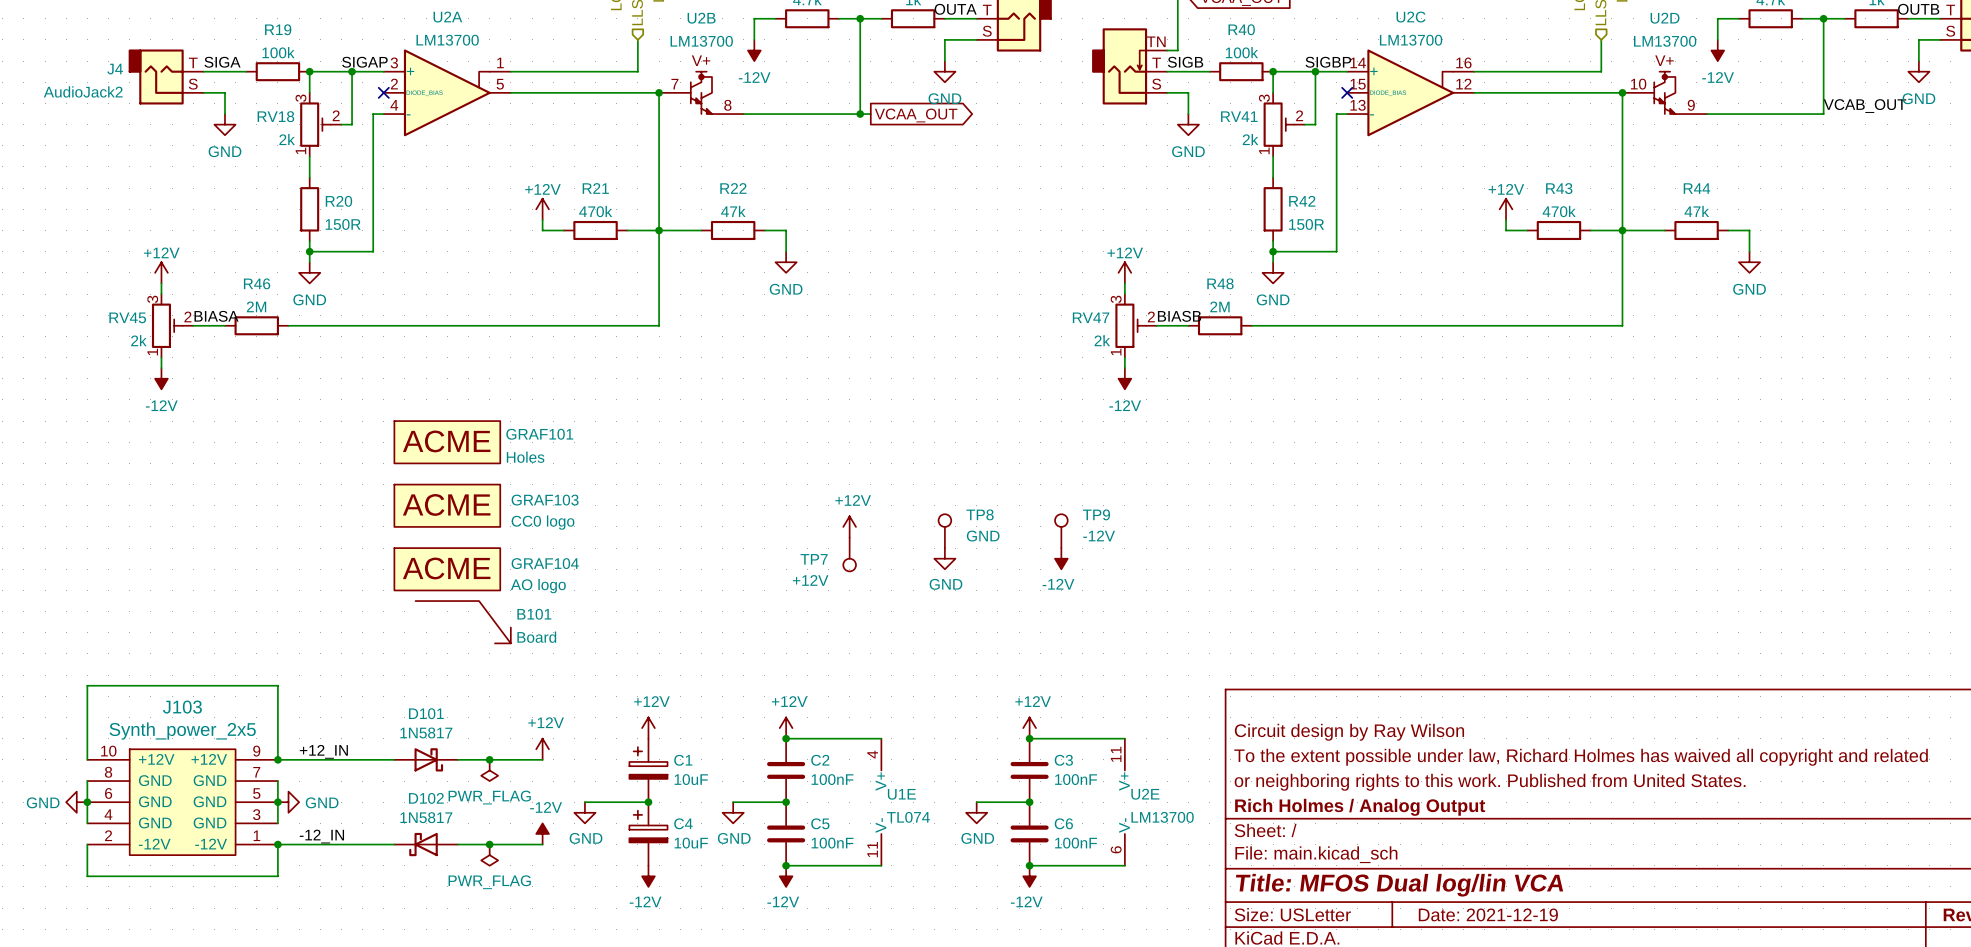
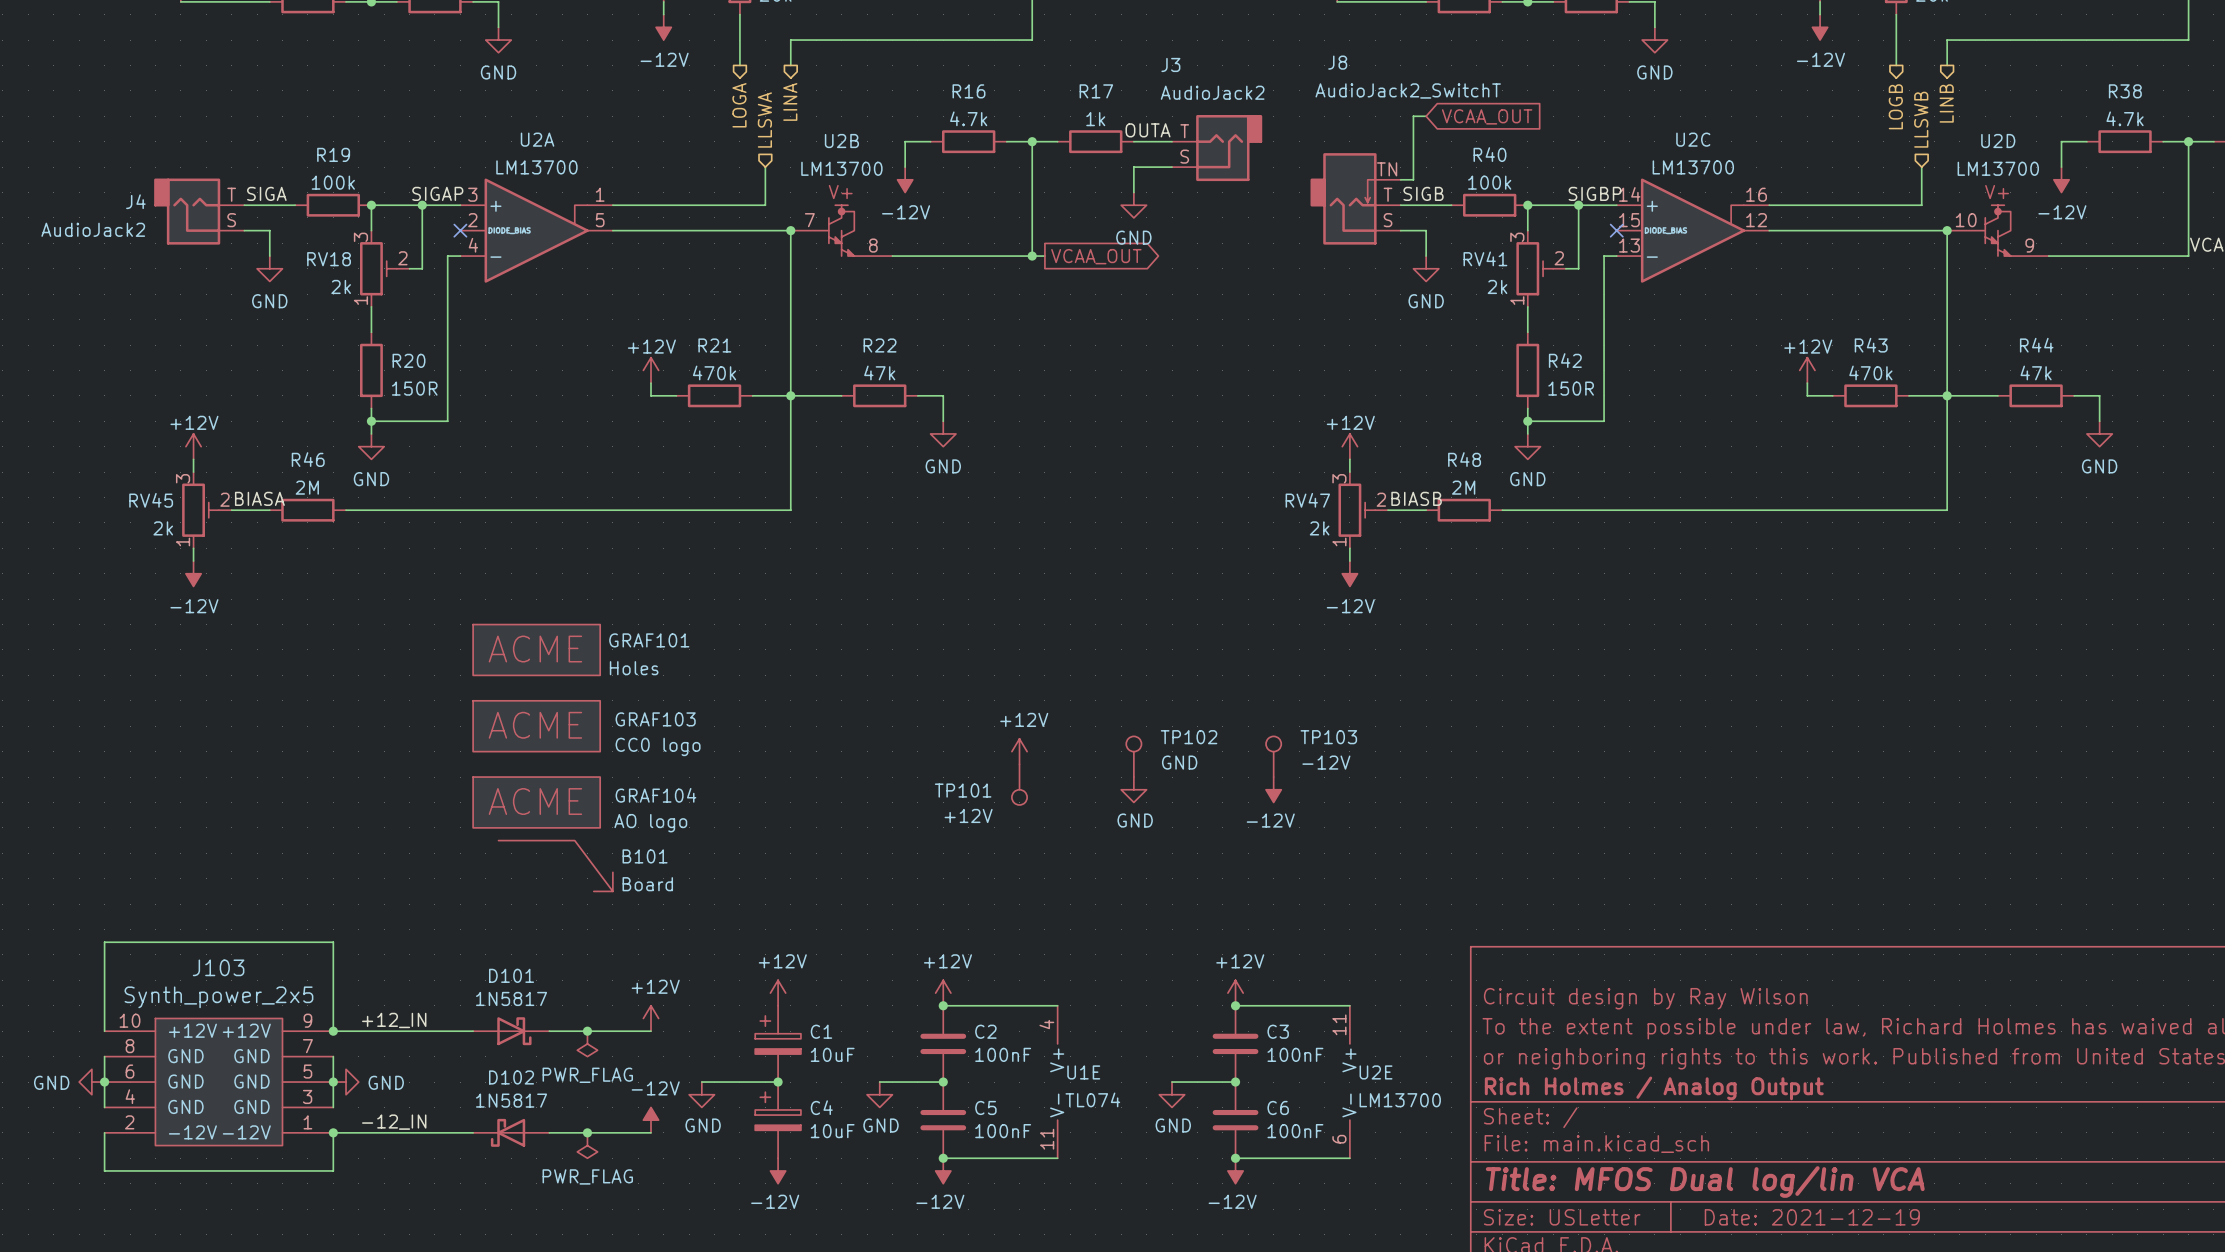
TP8 name: TP8 (980, 514) -> TP102 (1189, 737)
TP9 name: TP9 (1096, 514) -> TP103 (1328, 737)
TP7 name: TP7 (814, 559) -> TP101 (963, 790)

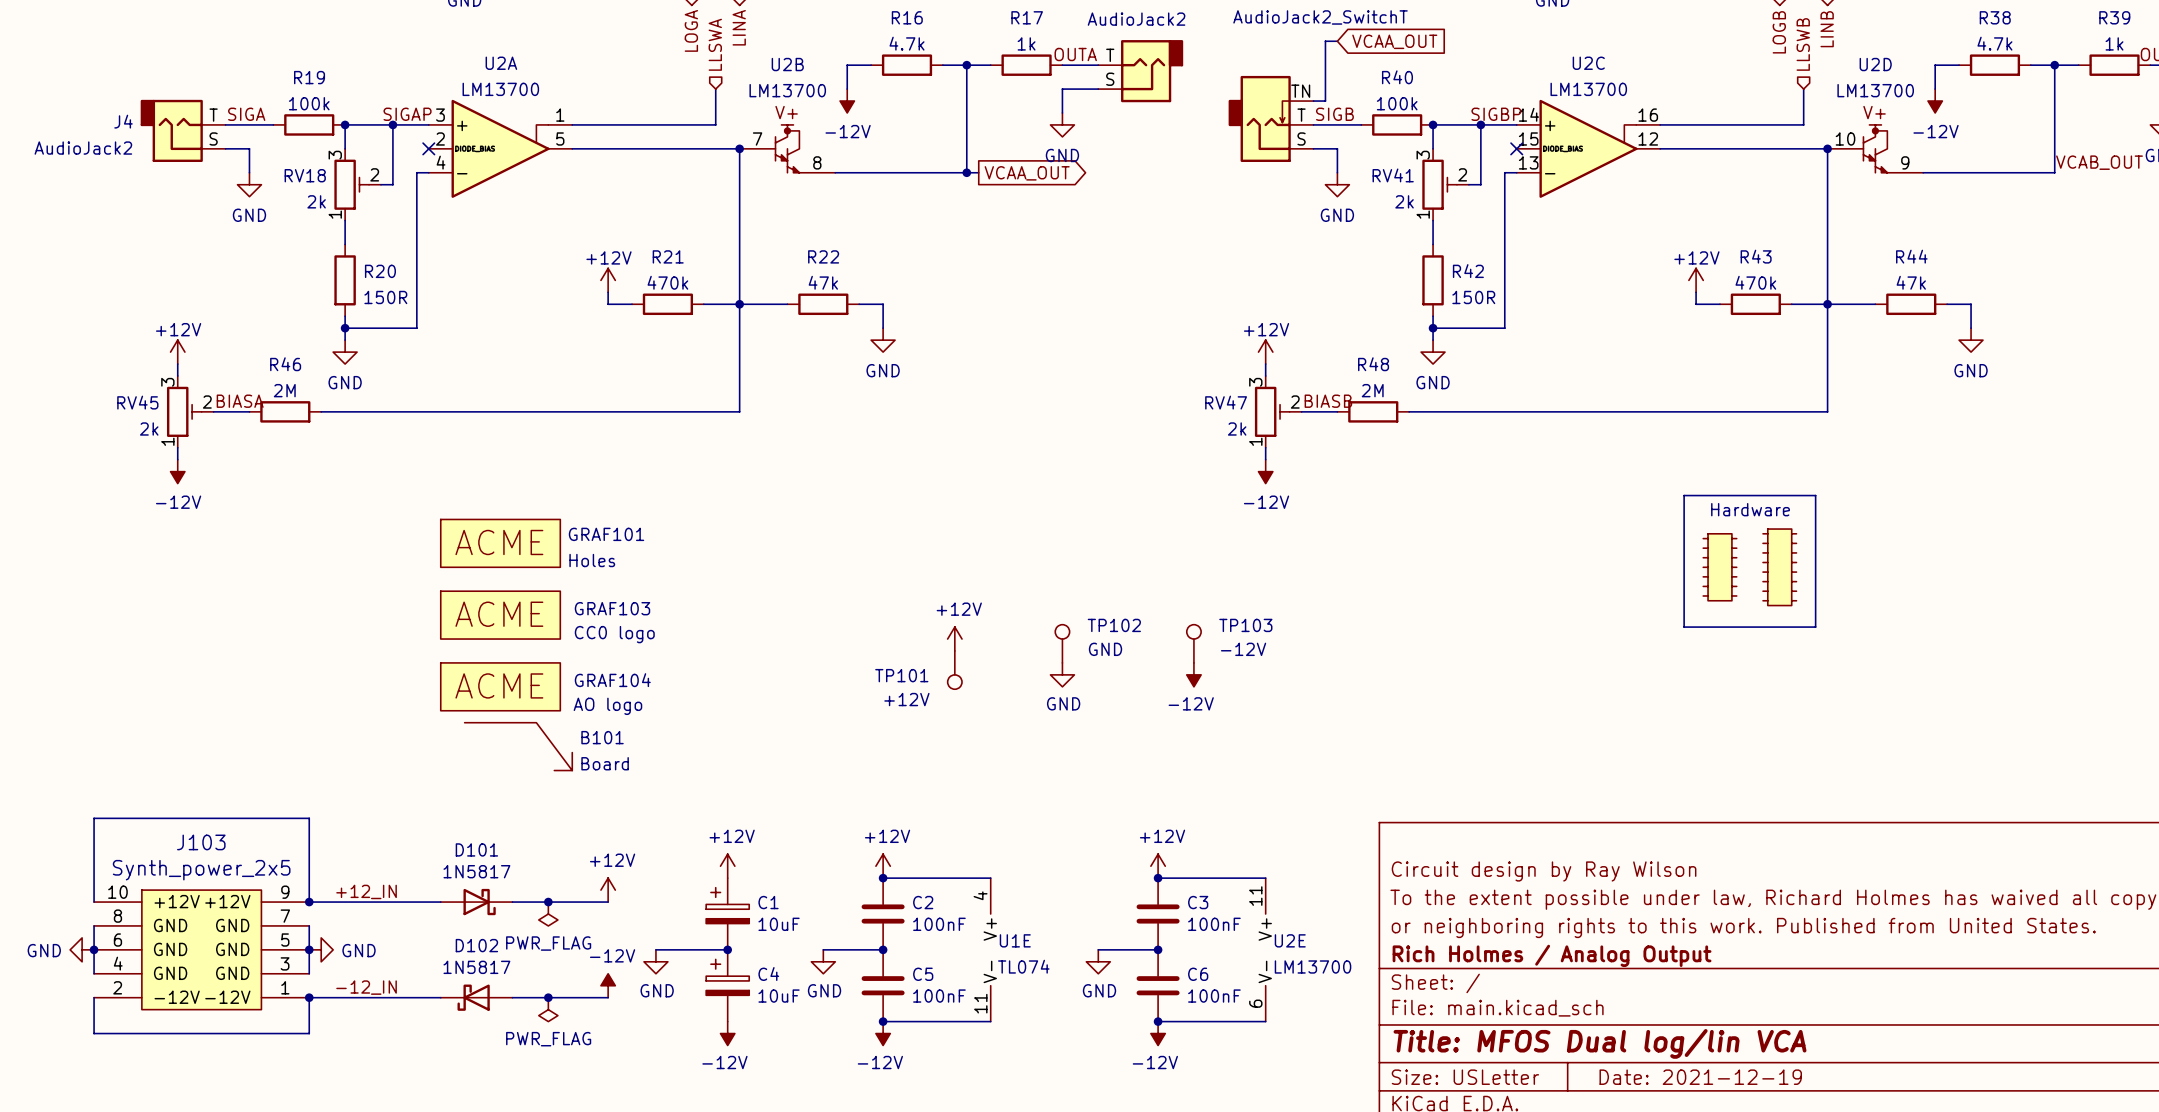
line: none -> (1684, 495) (1815, 495) (1815, 627) (1684, 627) (1684, 495)
text: none -> Hardware (1750, 509)
part: none -> (1719, 567)
part: none -> (1779, 567)

